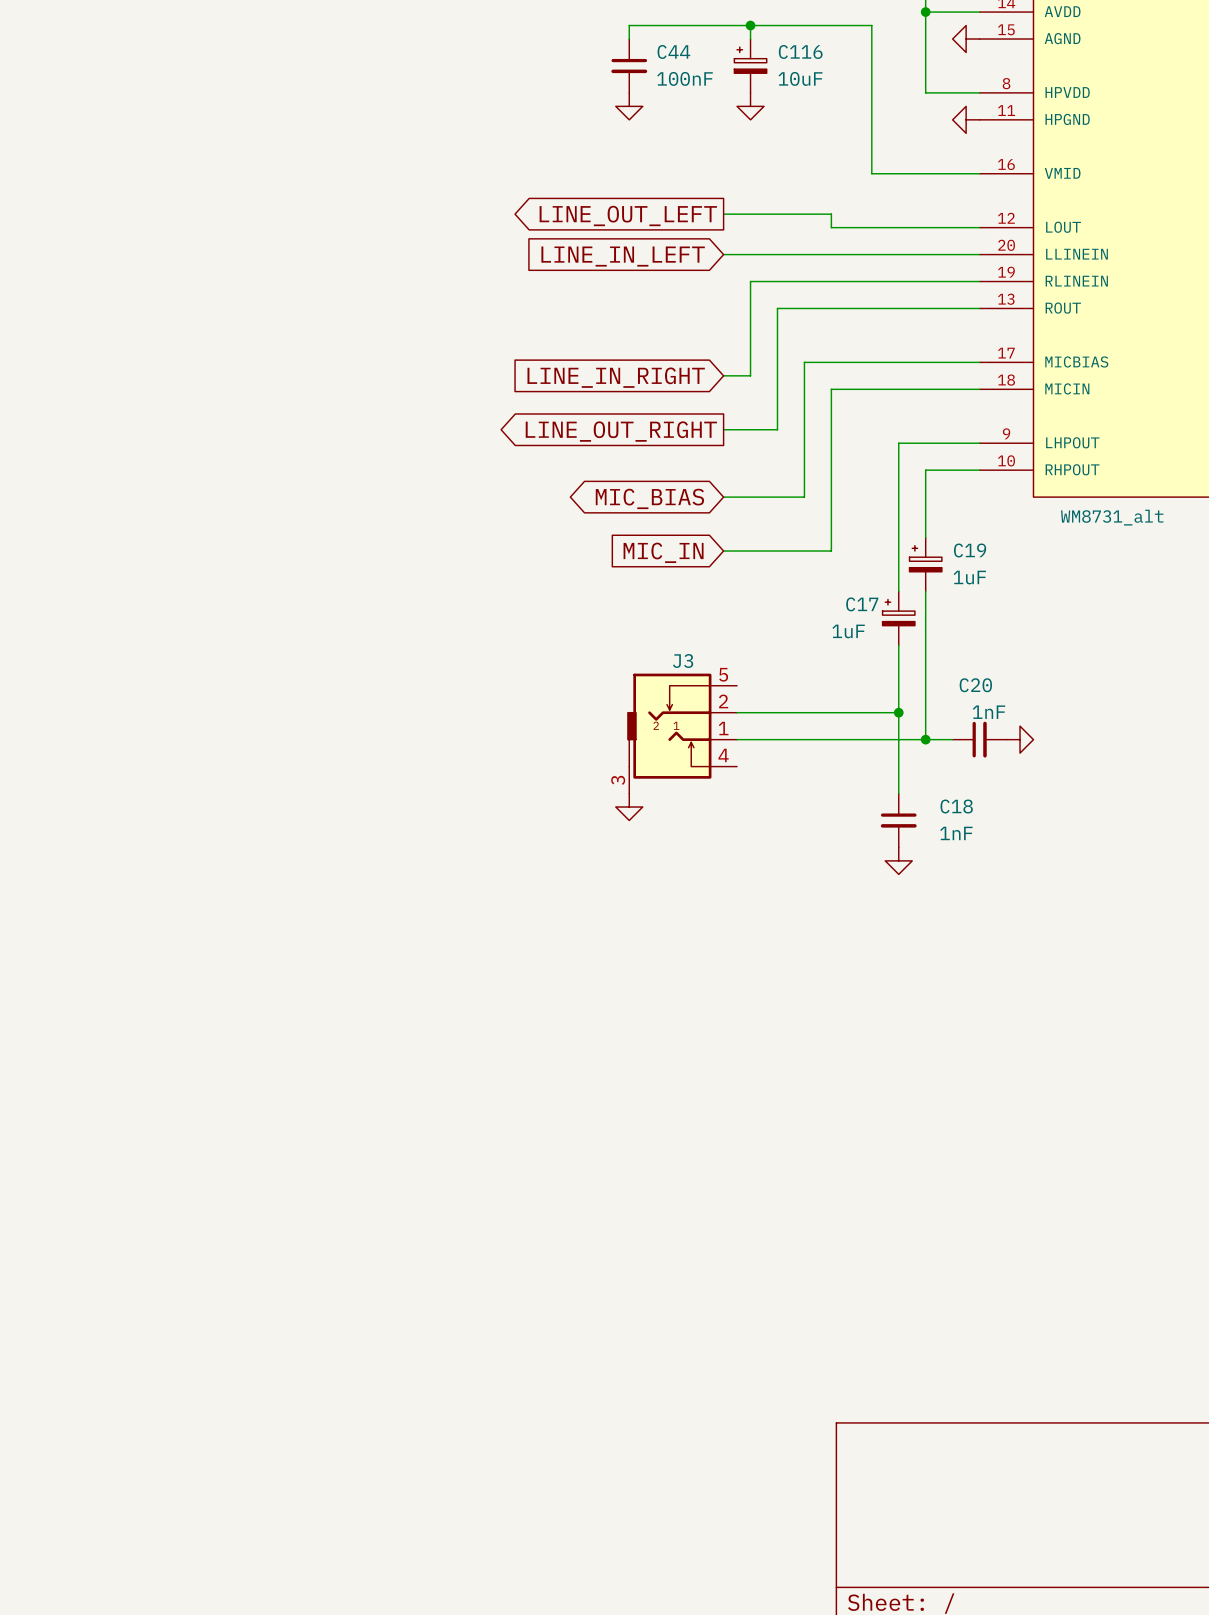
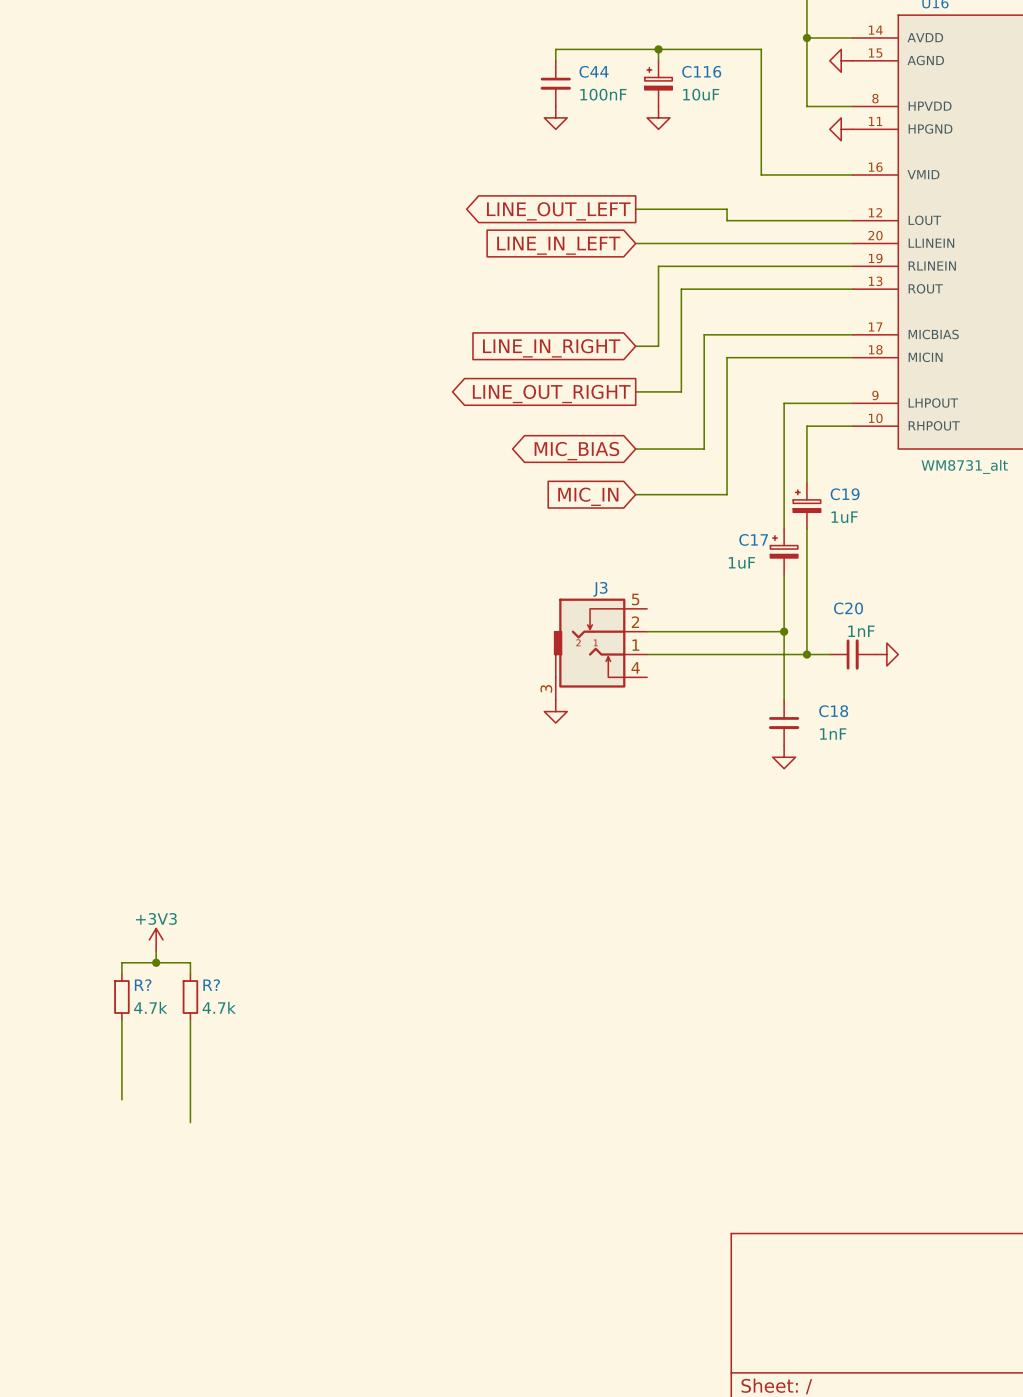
power symbol: none -> +3V3 (156, 939)
wire: none -> (156, 951) (156, 962)
junction: none -> (156, 962)
wire: none -> (121, 974) (121, 962) (190, 962) (190, 974)
R?: none -> 4.7k (121, 997)
R?: none -> 4.7k (190, 997)
wire: none -> (121, 1019) (121, 1099)
wire: none -> (190, 1019) (190, 1122)

